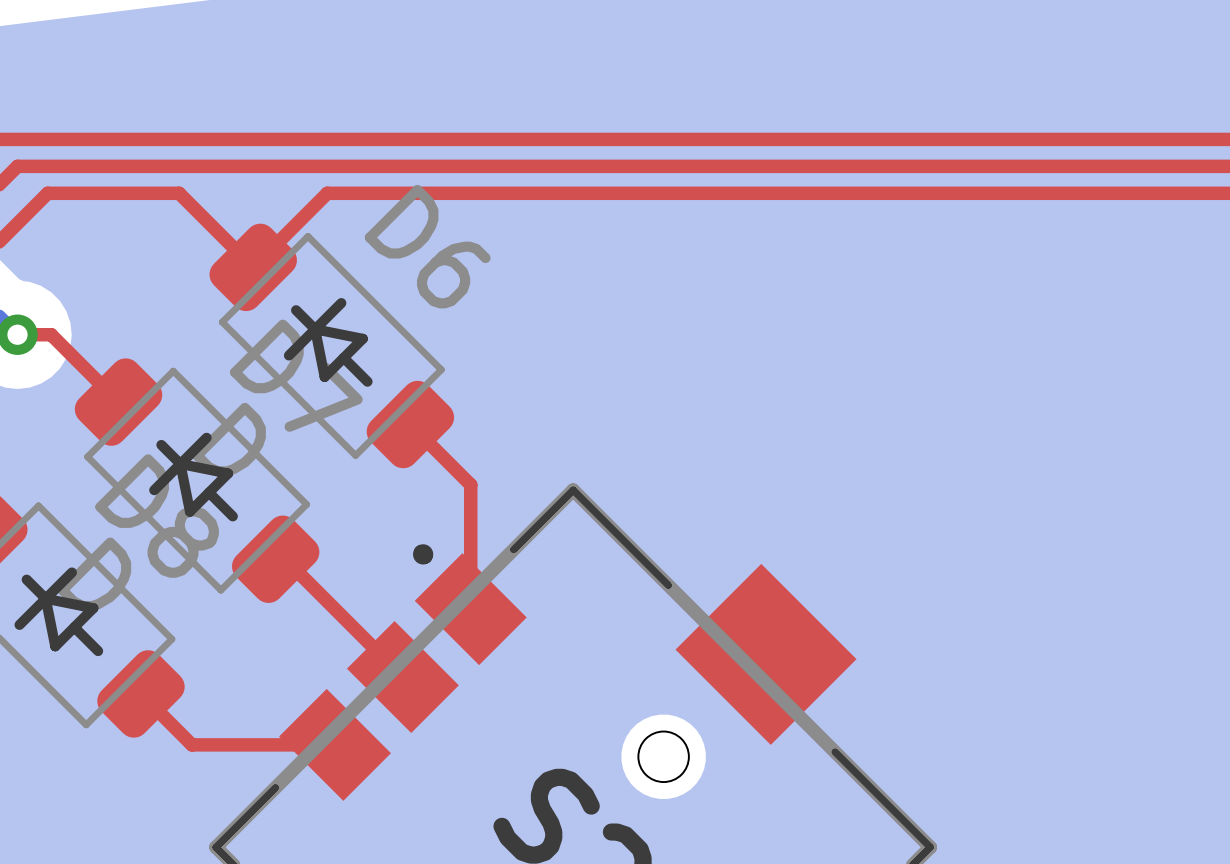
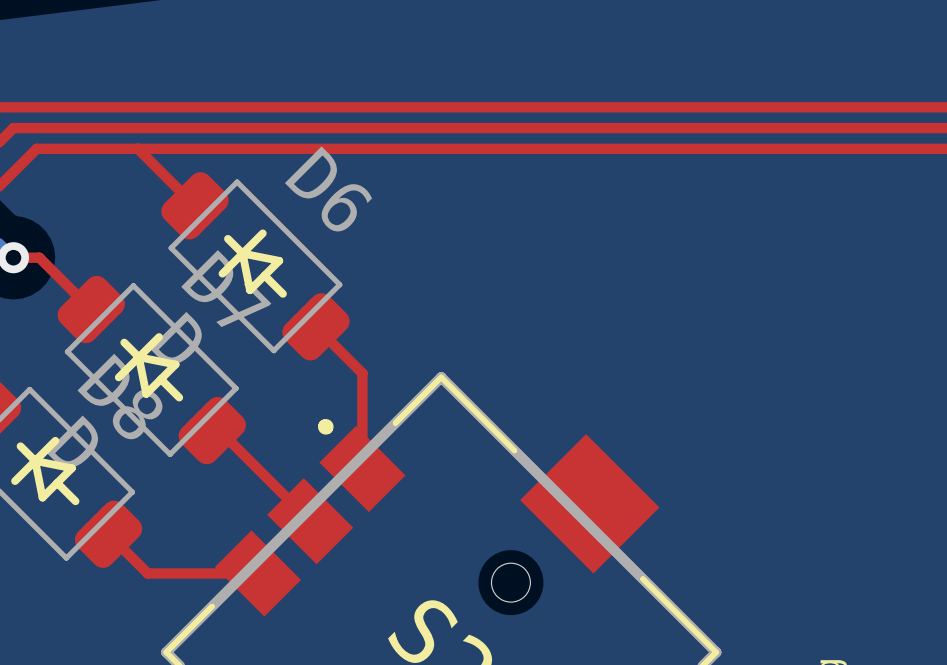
top track: (327, 193) (253, 267) -> (252, 148) (137, 148)

